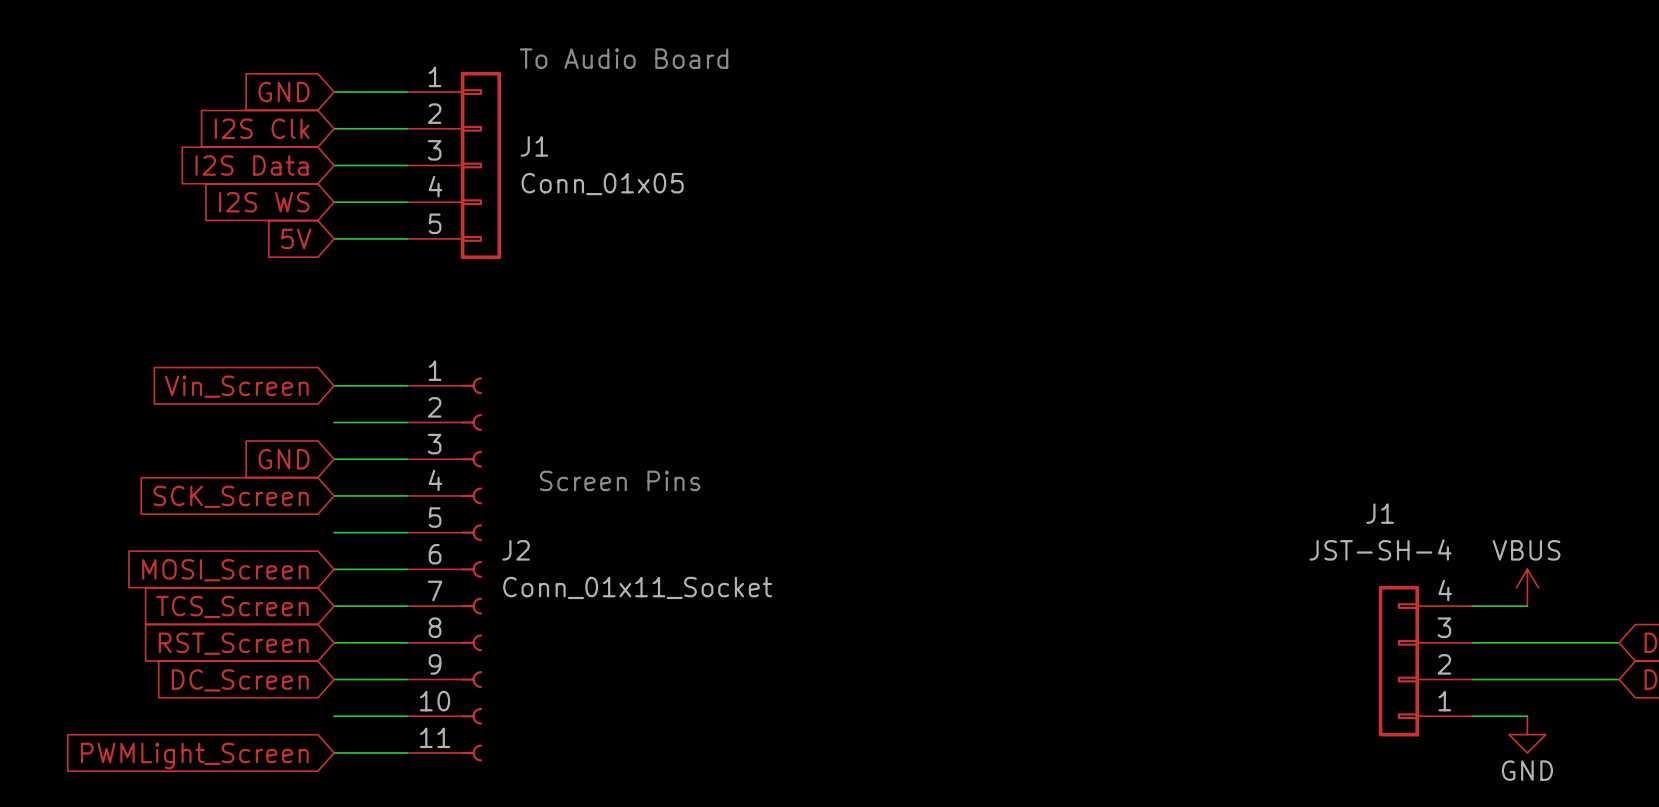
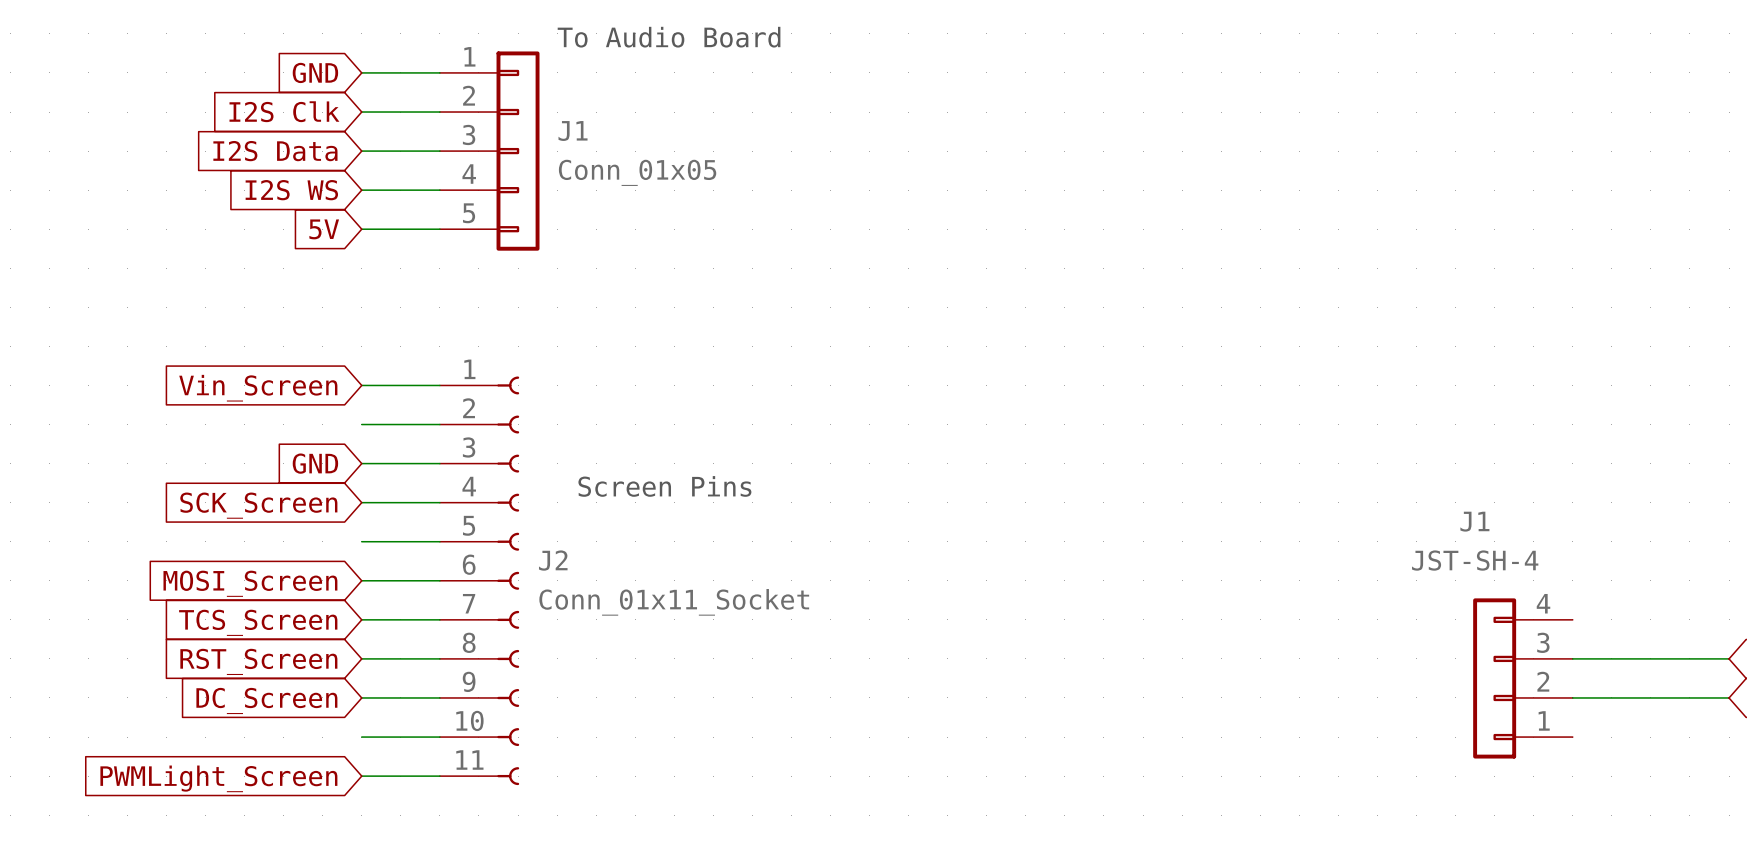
power symbol: VBUS (1527, 587) -> none
wire: (1472, 606) (1527, 606) -> none
wire: (1472, 716) (1527, 716) -> none
power symbol: GND (1527, 734) -> none

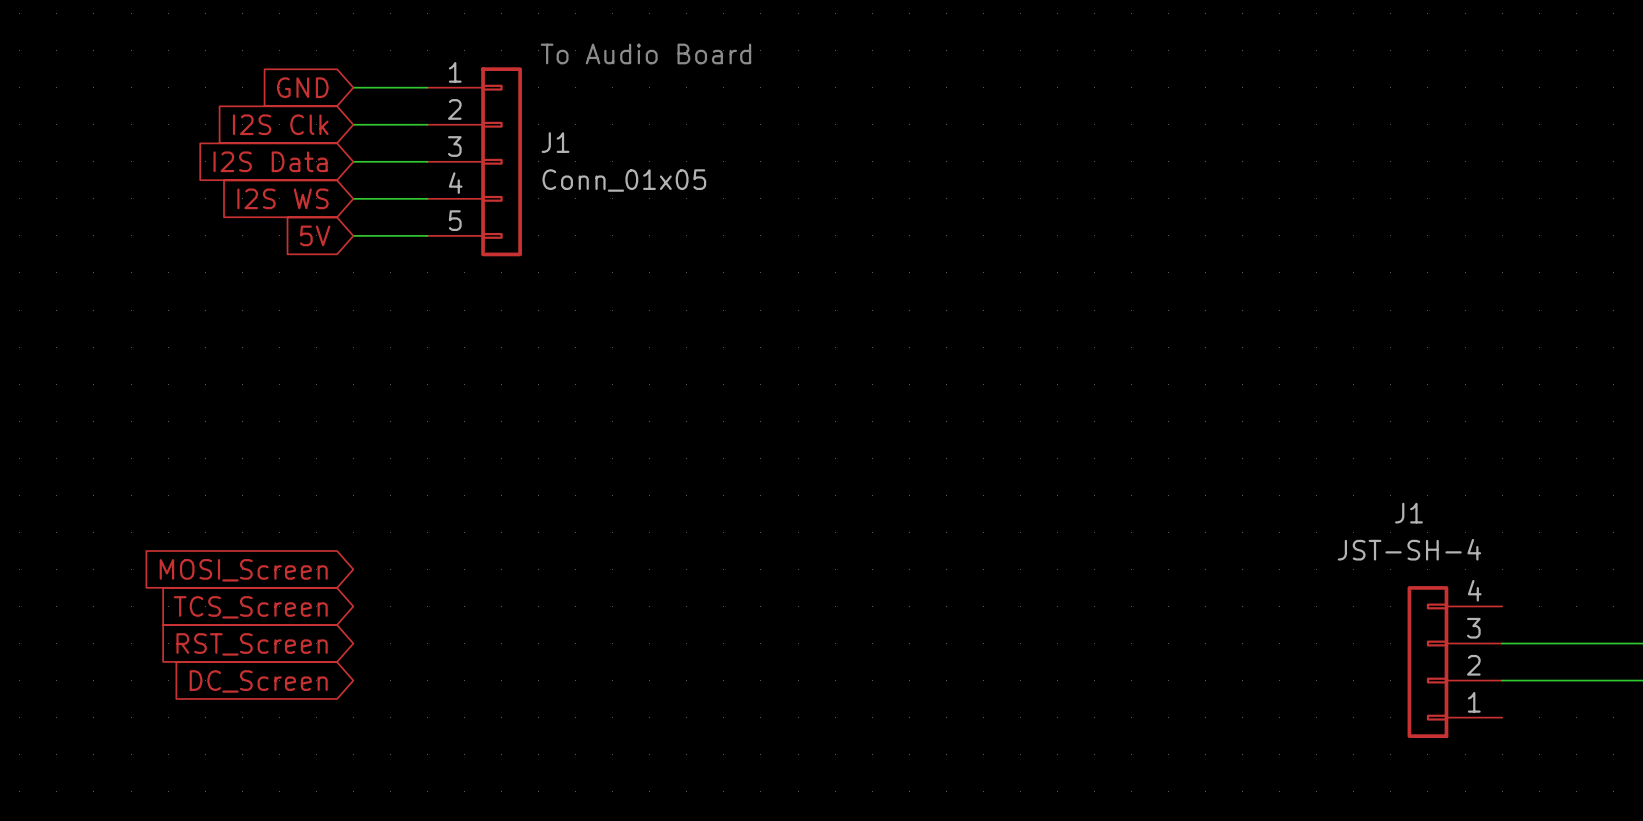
wire: (361, 385) (439, 385) -> none
global label: Vin_Screen (258, 388) -> none
wire: (361, 424) (439, 424) -> none
global label: GND (315, 463) -> none
wire: (361, 463) (439, 463) -> none
text: Screen Pins (664, 486) -> none
wire: (361, 502) (439, 502) -> none
global label: SCK_Screen (258, 505) -> none
wire: (361, 541) (439, 541) -> none
wire: (361, 580) (439, 580) -> none
J2: Conn_01x11_Socket (479, 580) -> none
wire: (361, 619) (439, 619) -> none
wire: (361, 658) (439, 658) -> none
wire: (361, 697) (439, 697) -> none
wire: (361, 737) (439, 737) -> none
wire: (361, 776) (439, 776) -> none
global label: PWMLight_Screen (218, 778) -> none

